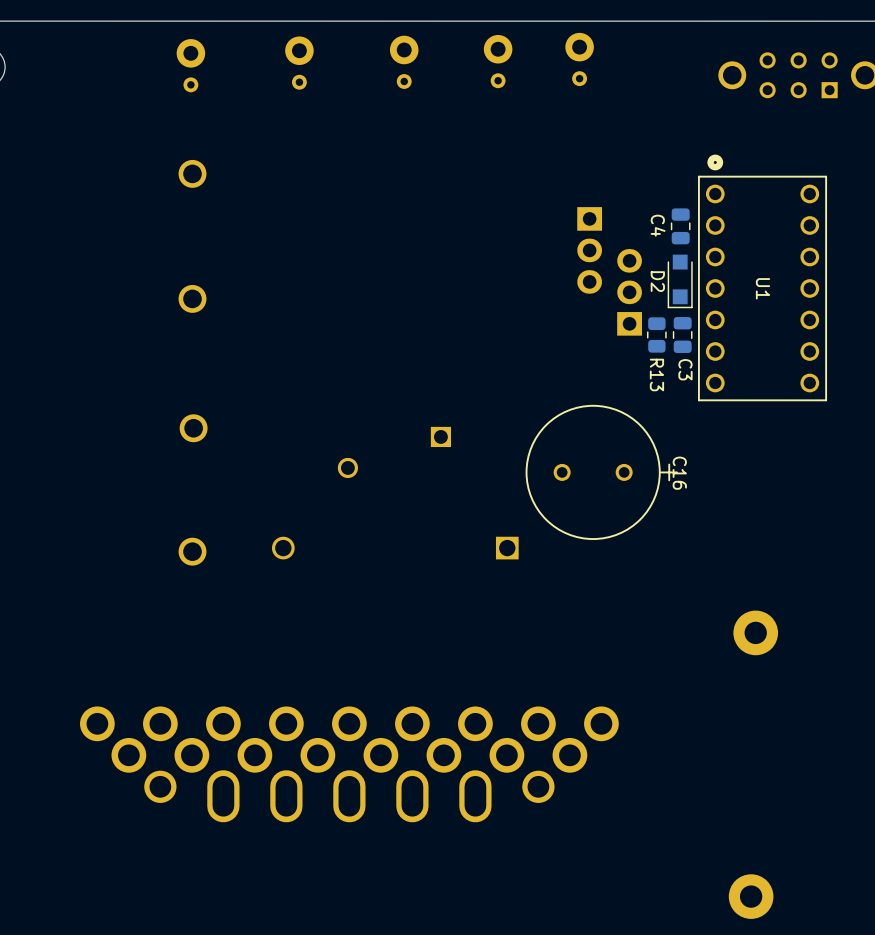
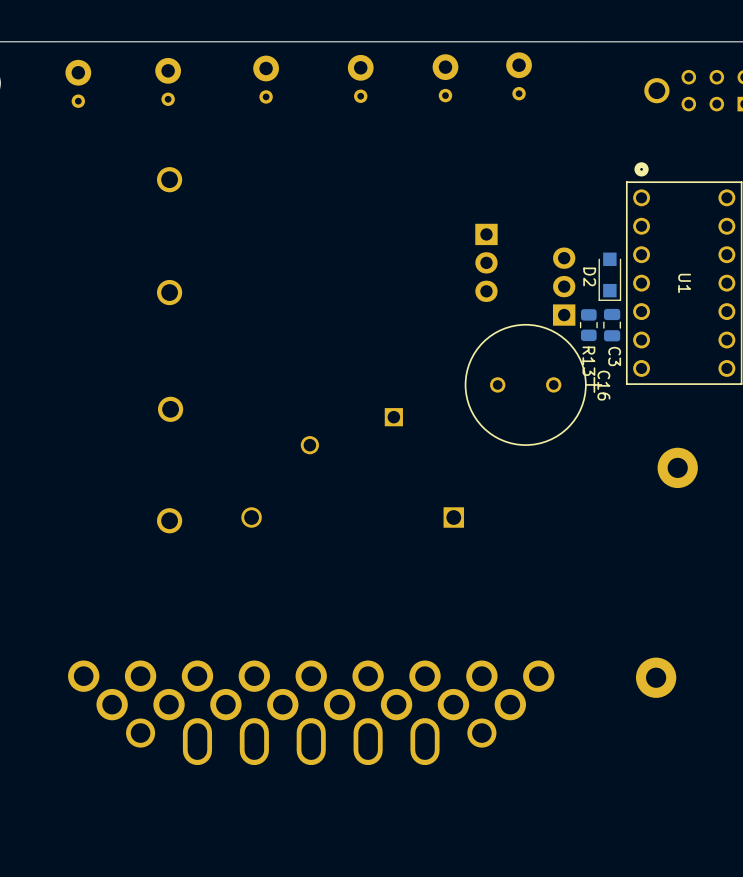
part: none -> (78, 83)
C4: (680, 226) -> none
part position: (589, 250) -> (486, 262)
C16 position: (601, 472) -> (533, 384)
part: none -> (677, 467)
part: (755, 632) -> none
part: none -> (656, 677)
part: (751, 896) -> none

